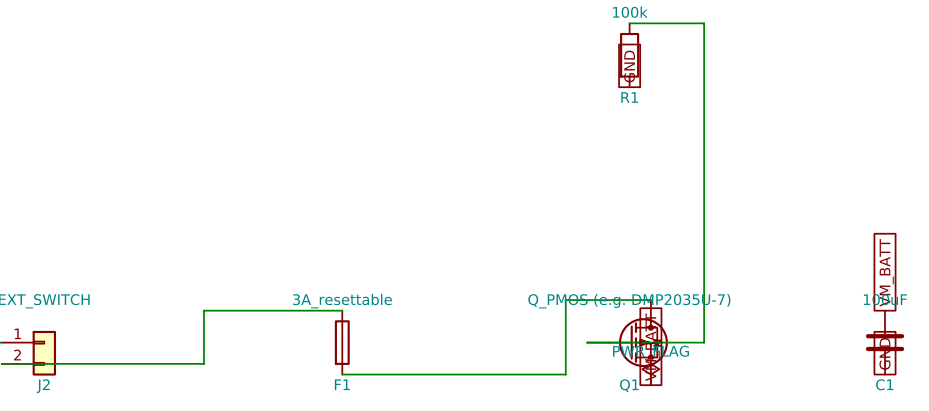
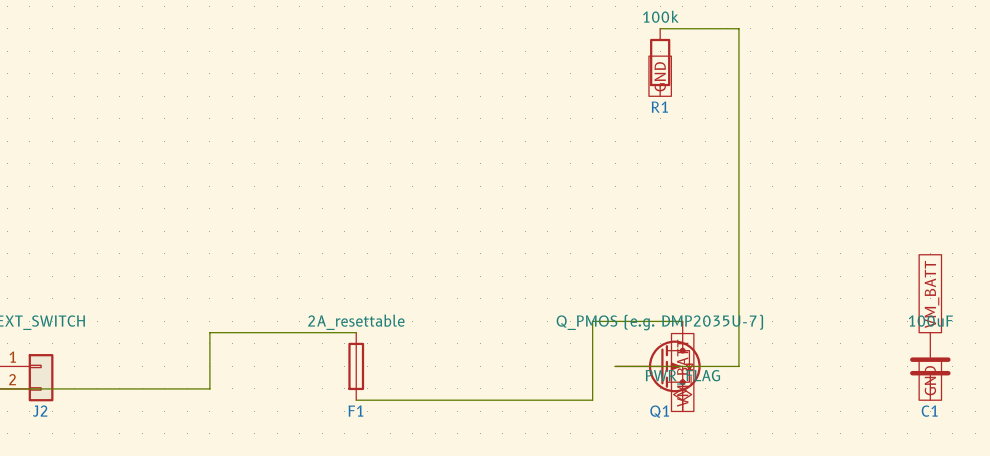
F1 value: 3A_resettable (342, 301) -> 2A_resettable (356, 322)

